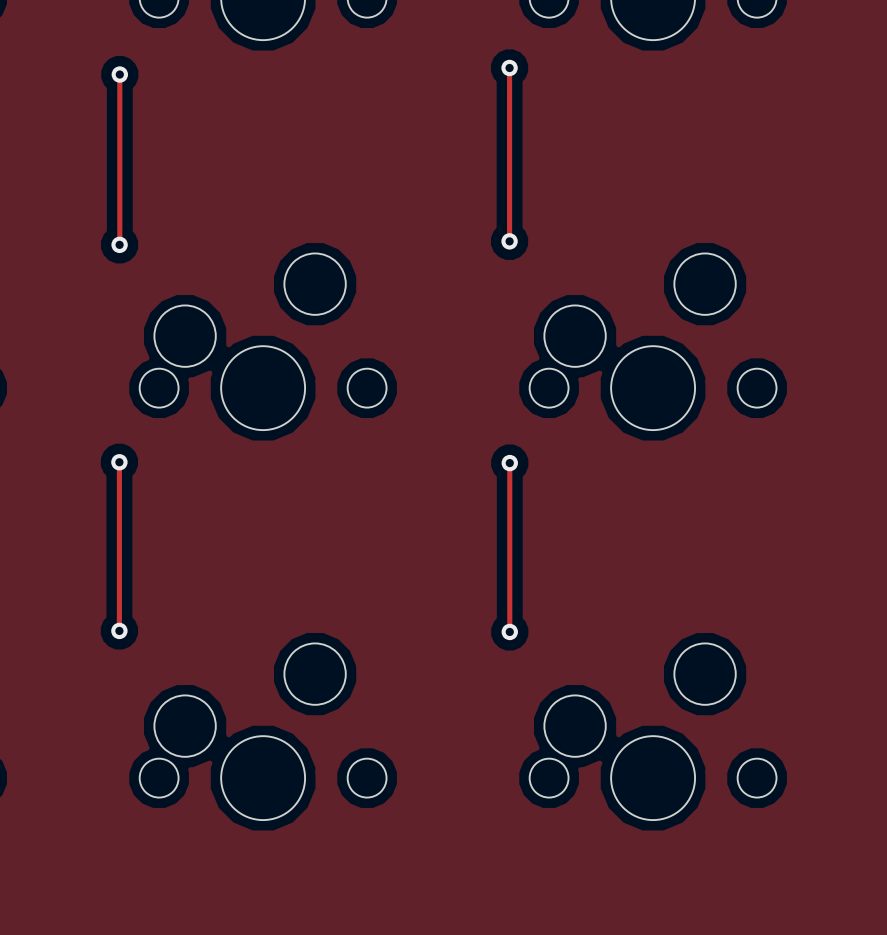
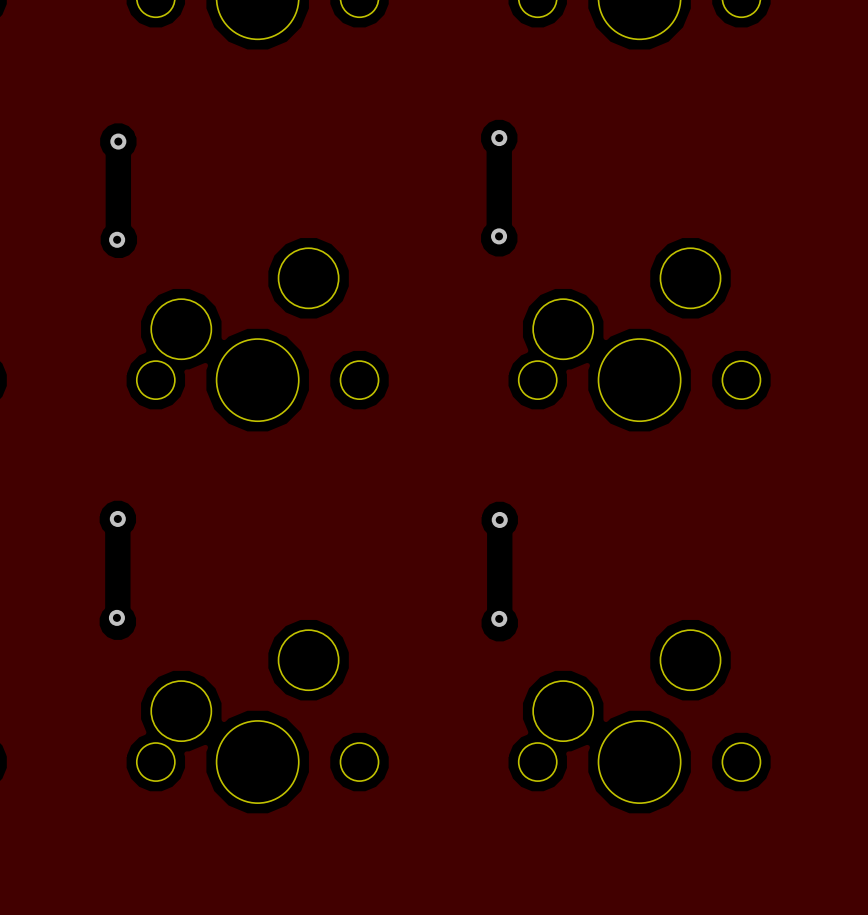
track: (509, 67) (509, 241) -> none
via position: (509, 67) -> (499, 138)
track: (119, 74) (119, 244) -> none
via position: (119, 74) -> (118, 141)
track: (119, 462) (119, 630) -> none
via position: (119, 462) -> (117, 518)
track: (509, 463) (509, 631) -> none
via position: (509, 463) -> (499, 519)

